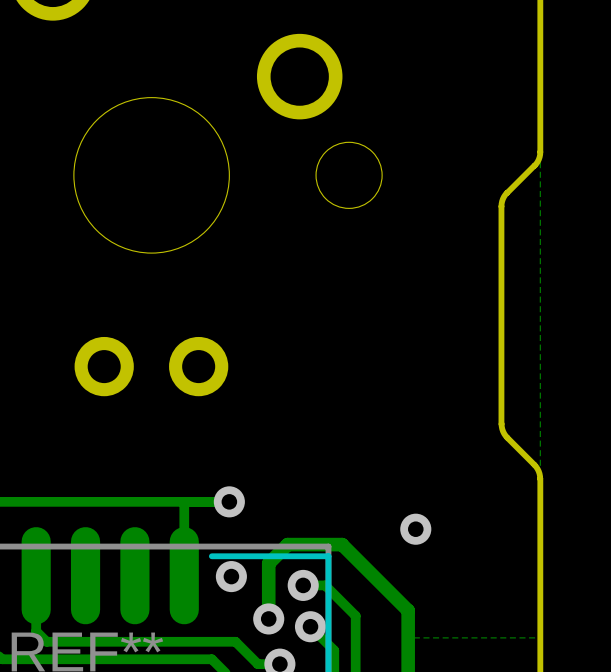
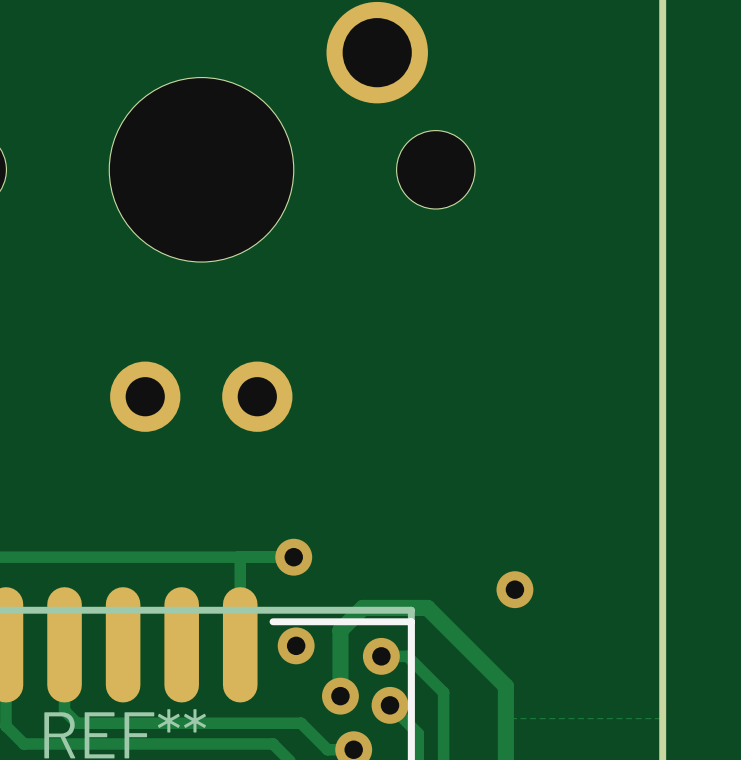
board edge: (540, 152) (536, 163) (505, 194) (501, 206) (501, 426) (505, 435) (536, 466) (540, 478) -> (662, 142) (662, 529)

